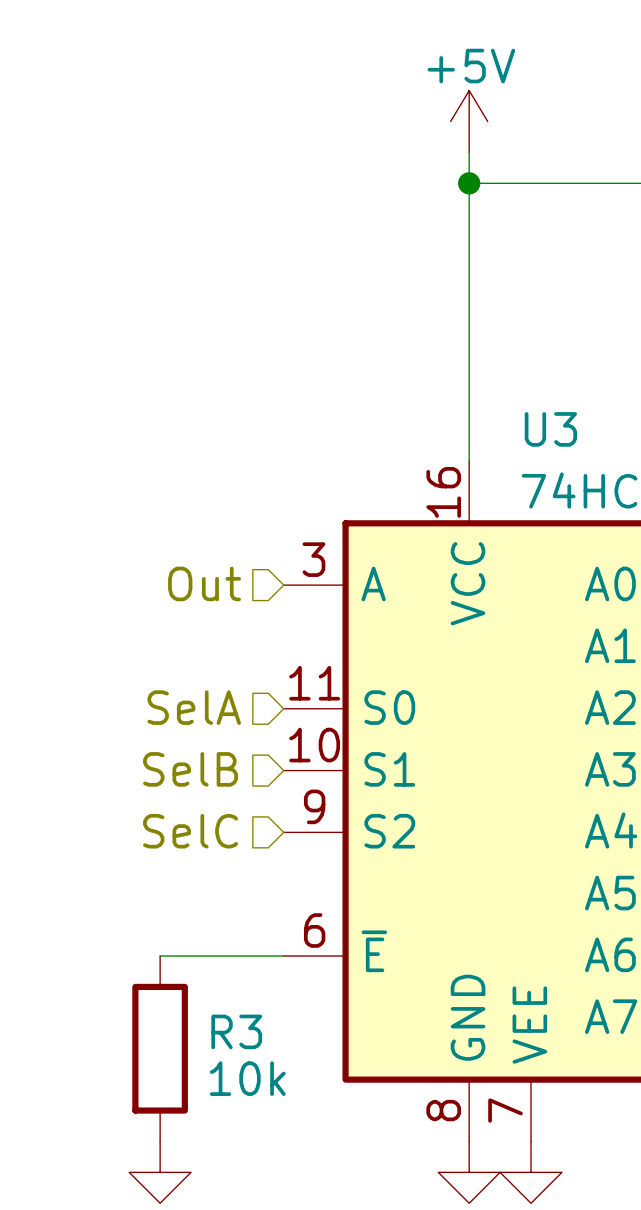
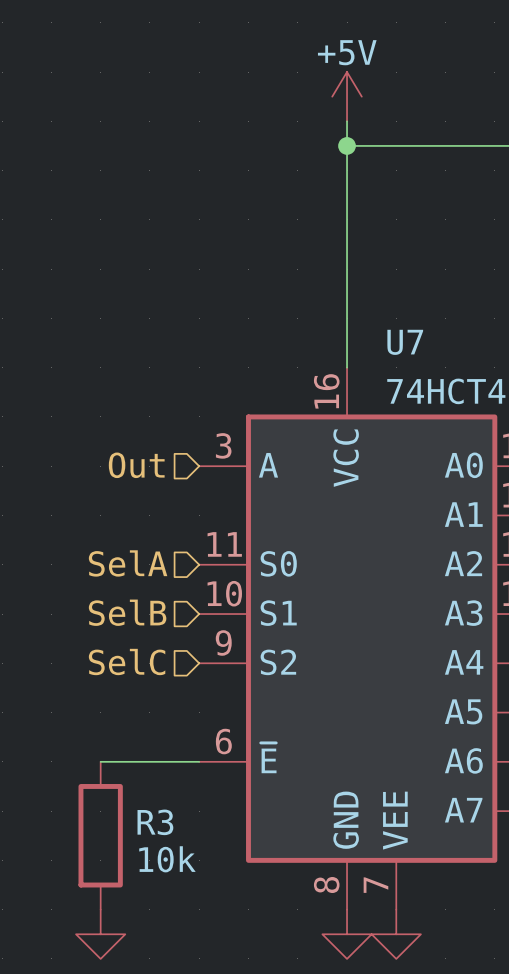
U3 name: U3 (550, 429) -> U7 (405, 342)

